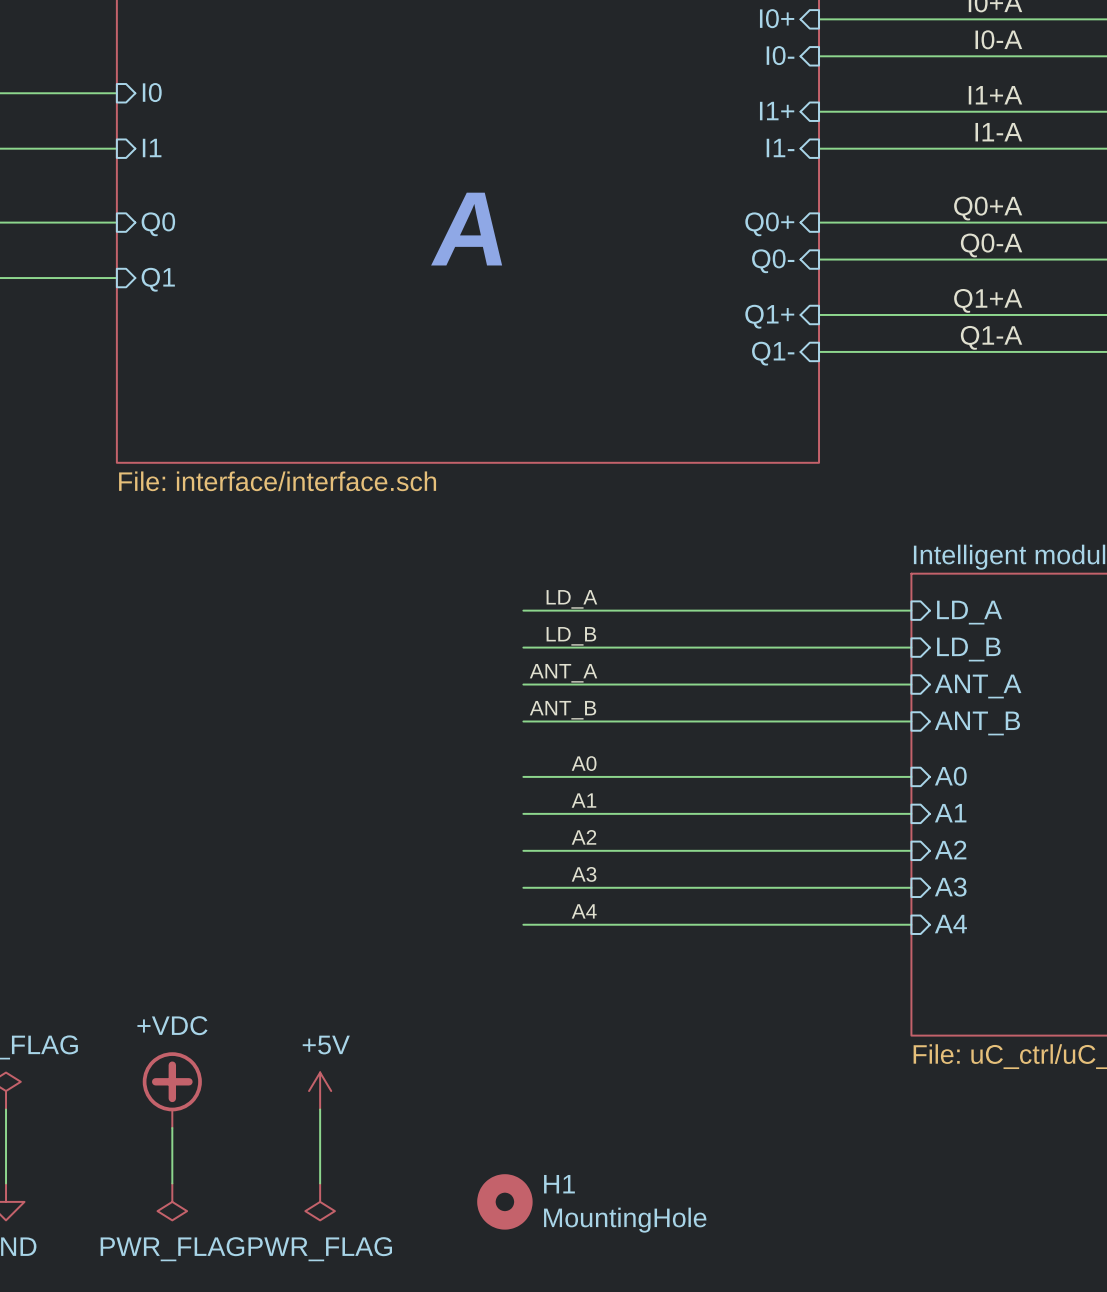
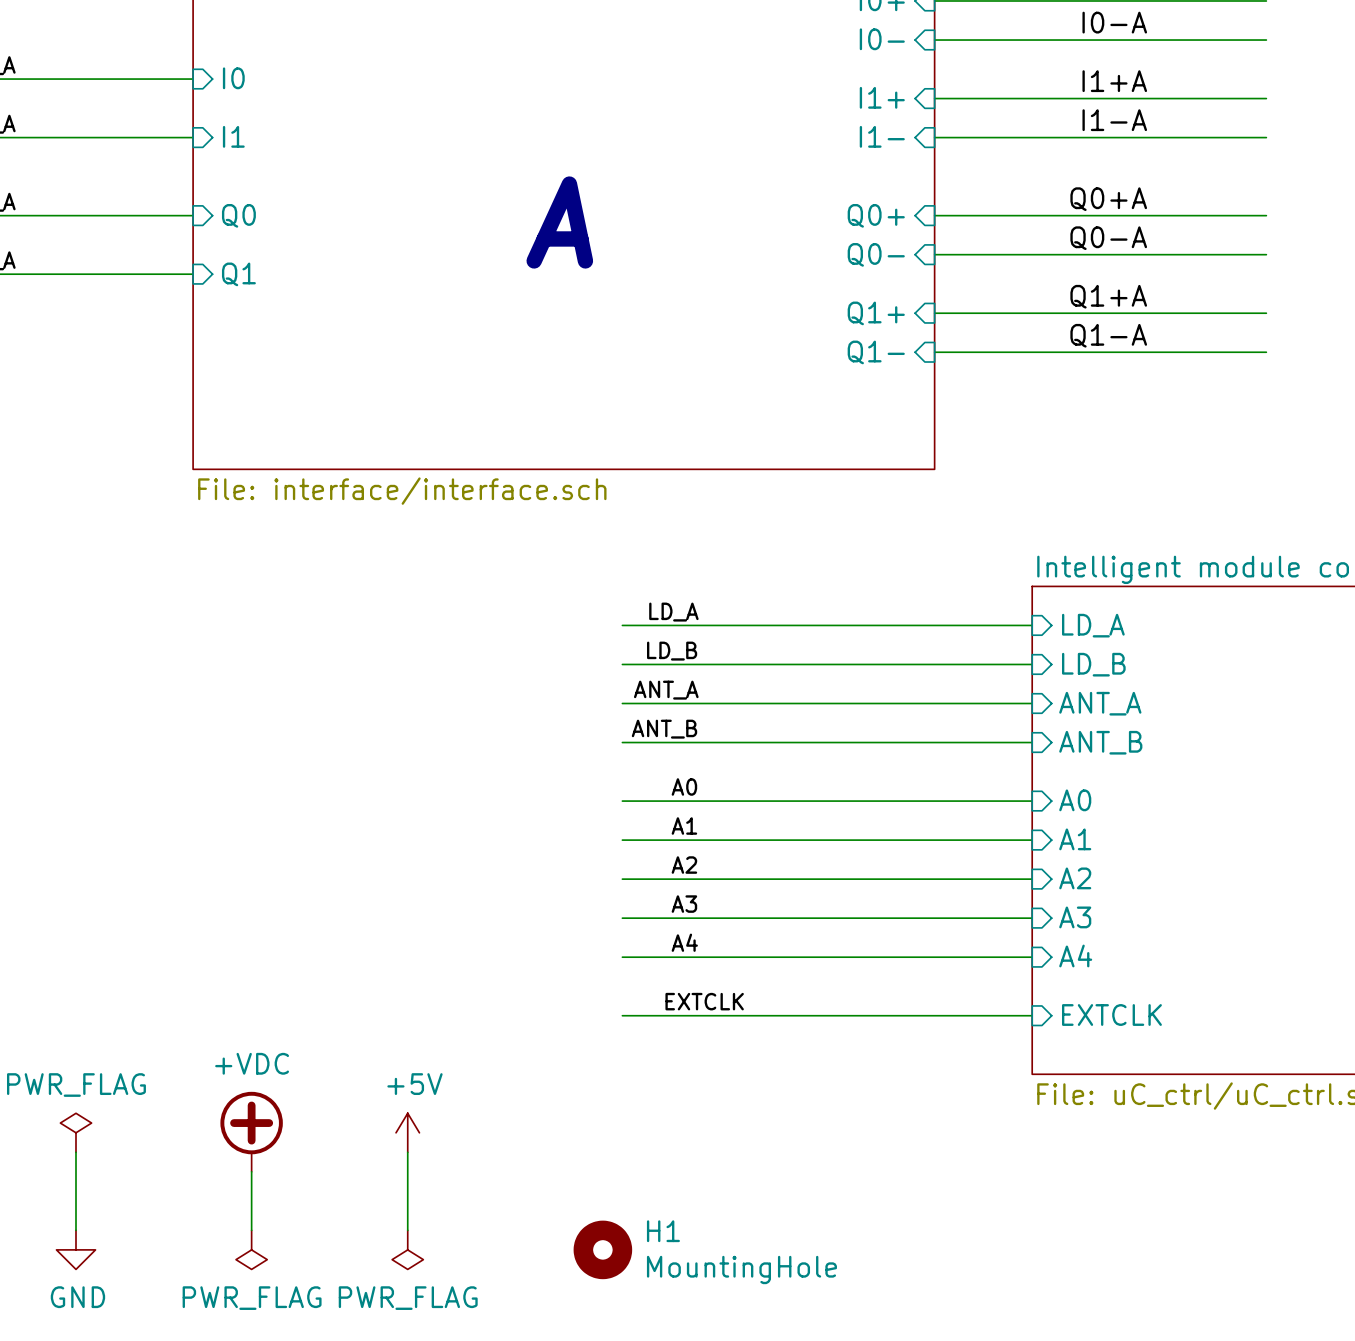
label: none -> EXTCLK (704, 1001)
sheet pin: none -> EXTCLK (1111, 1015)
wire: none -> (622, 1015) (1032, 1015)

